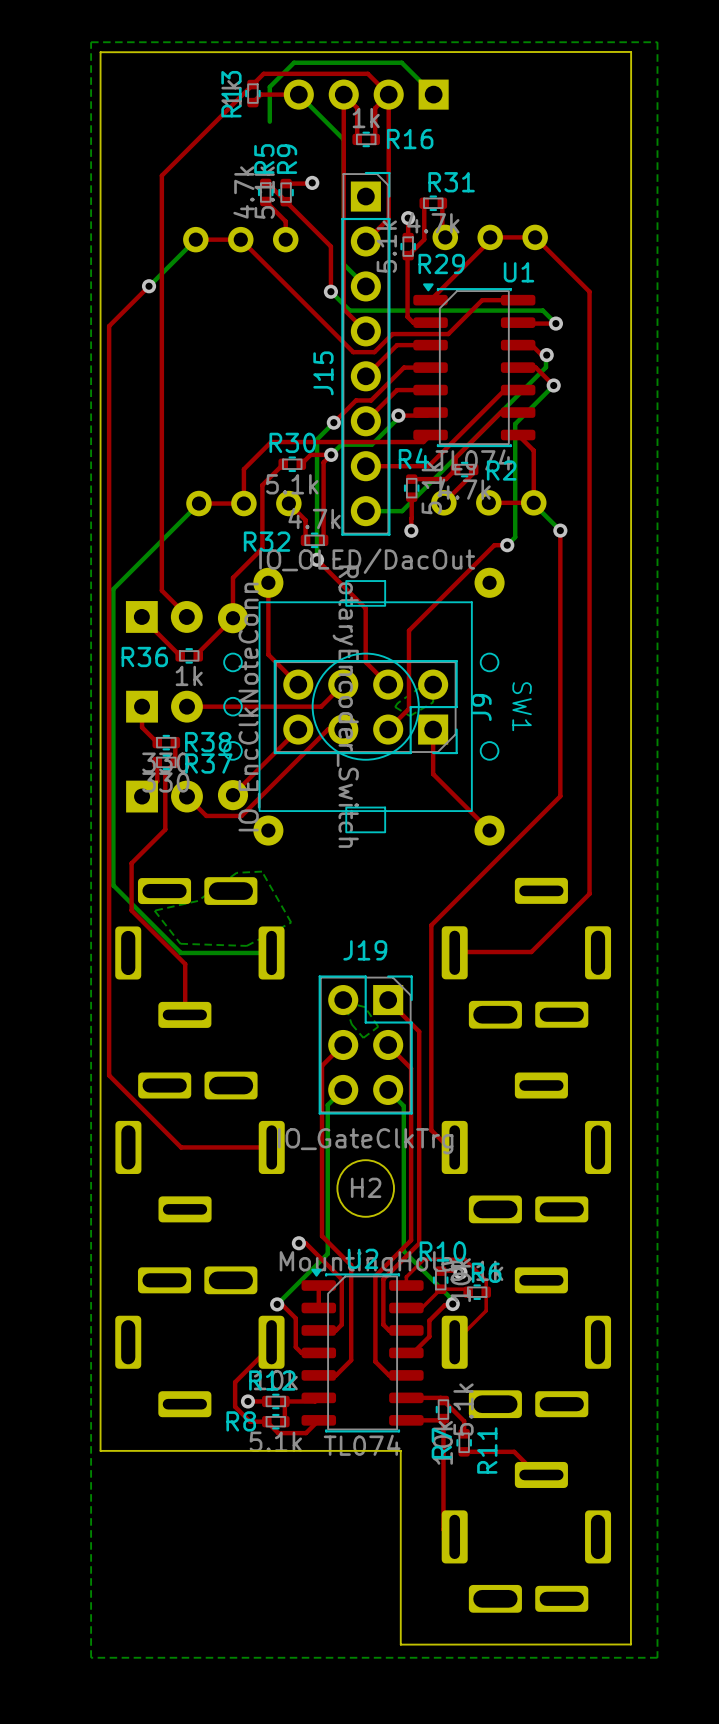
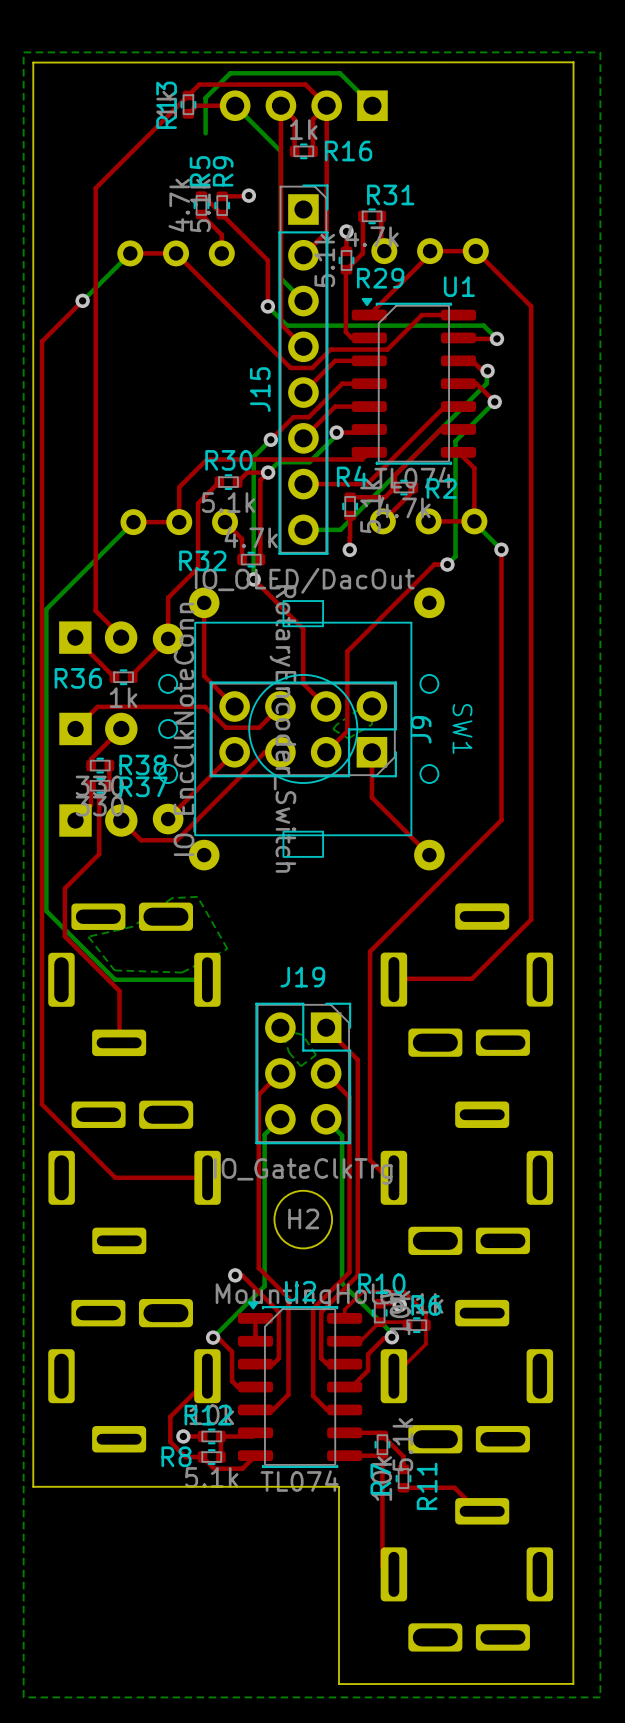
top track: (322, 705) (186, 706) -> (259, 727) (225, 727) (205, 706) (97, 706) (75, 728)
top track: (142, 706) (142, 727) (157, 742) -> (121, 728) (91, 759) (91, 765)

